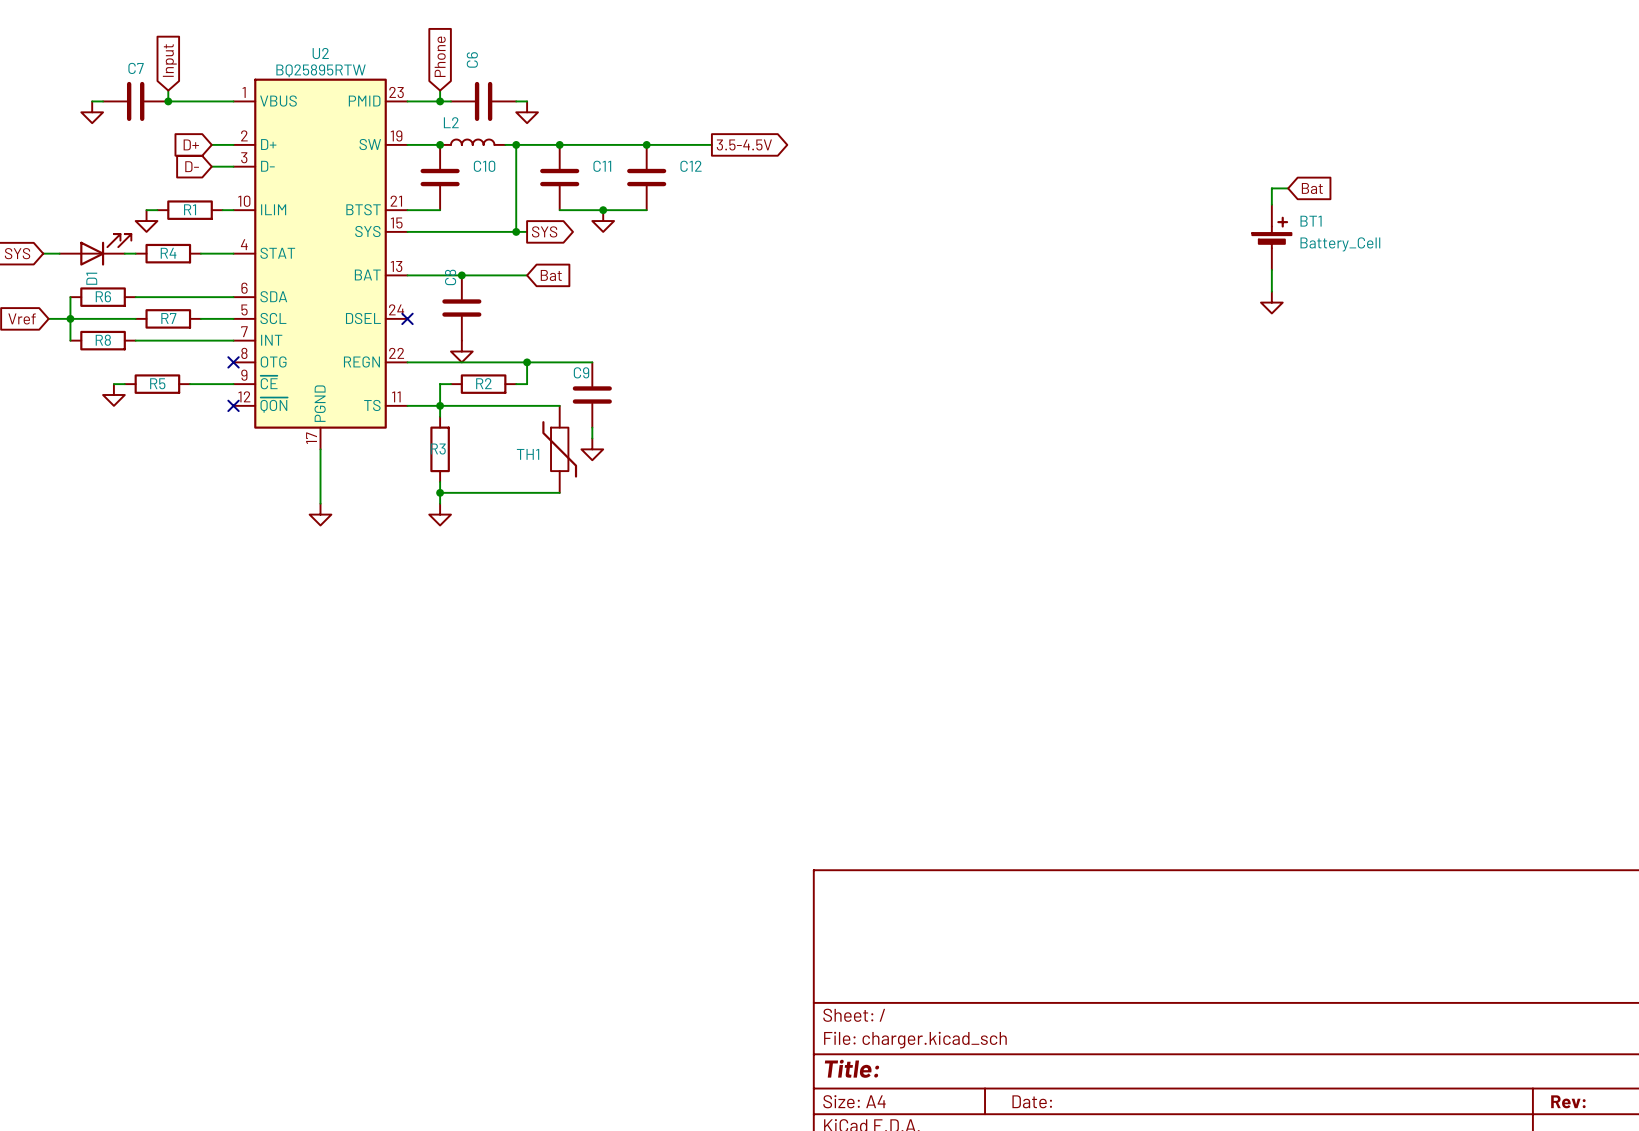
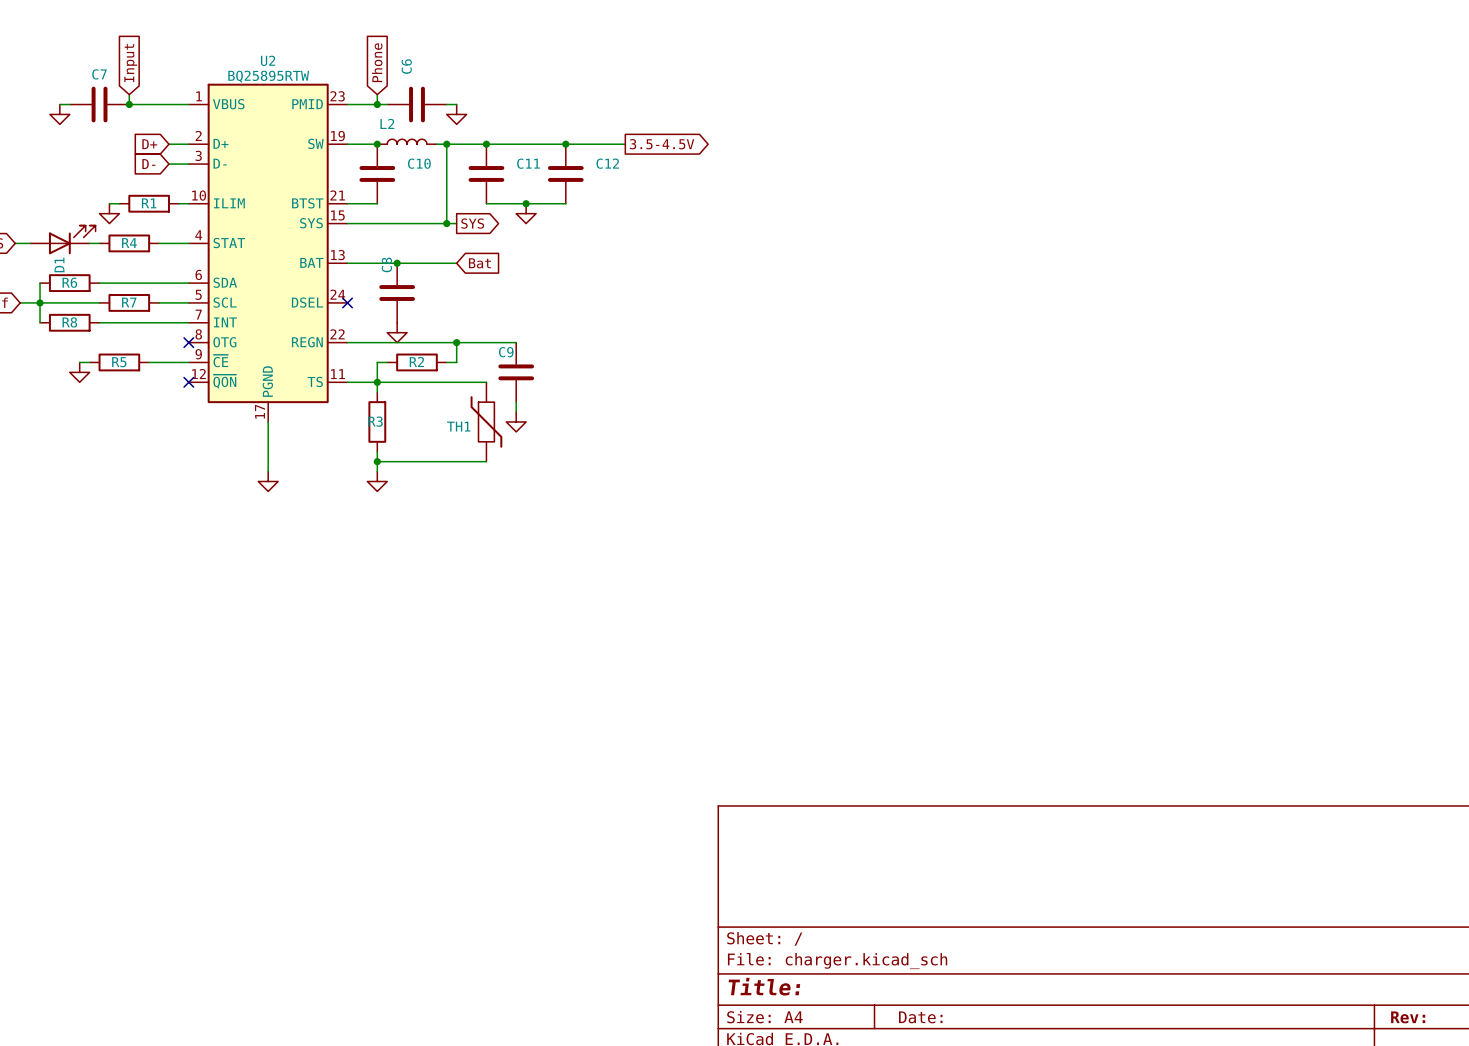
wire: (1288, 188) (1271, 188) (1271, 204) -> none
global label: Bat (1312, 188) -> none
BT1: Battery_Cell (1271, 237) -> none
wire: (1271, 269) (1271, 291) -> none
power symbol: (1271, 302) -> none

